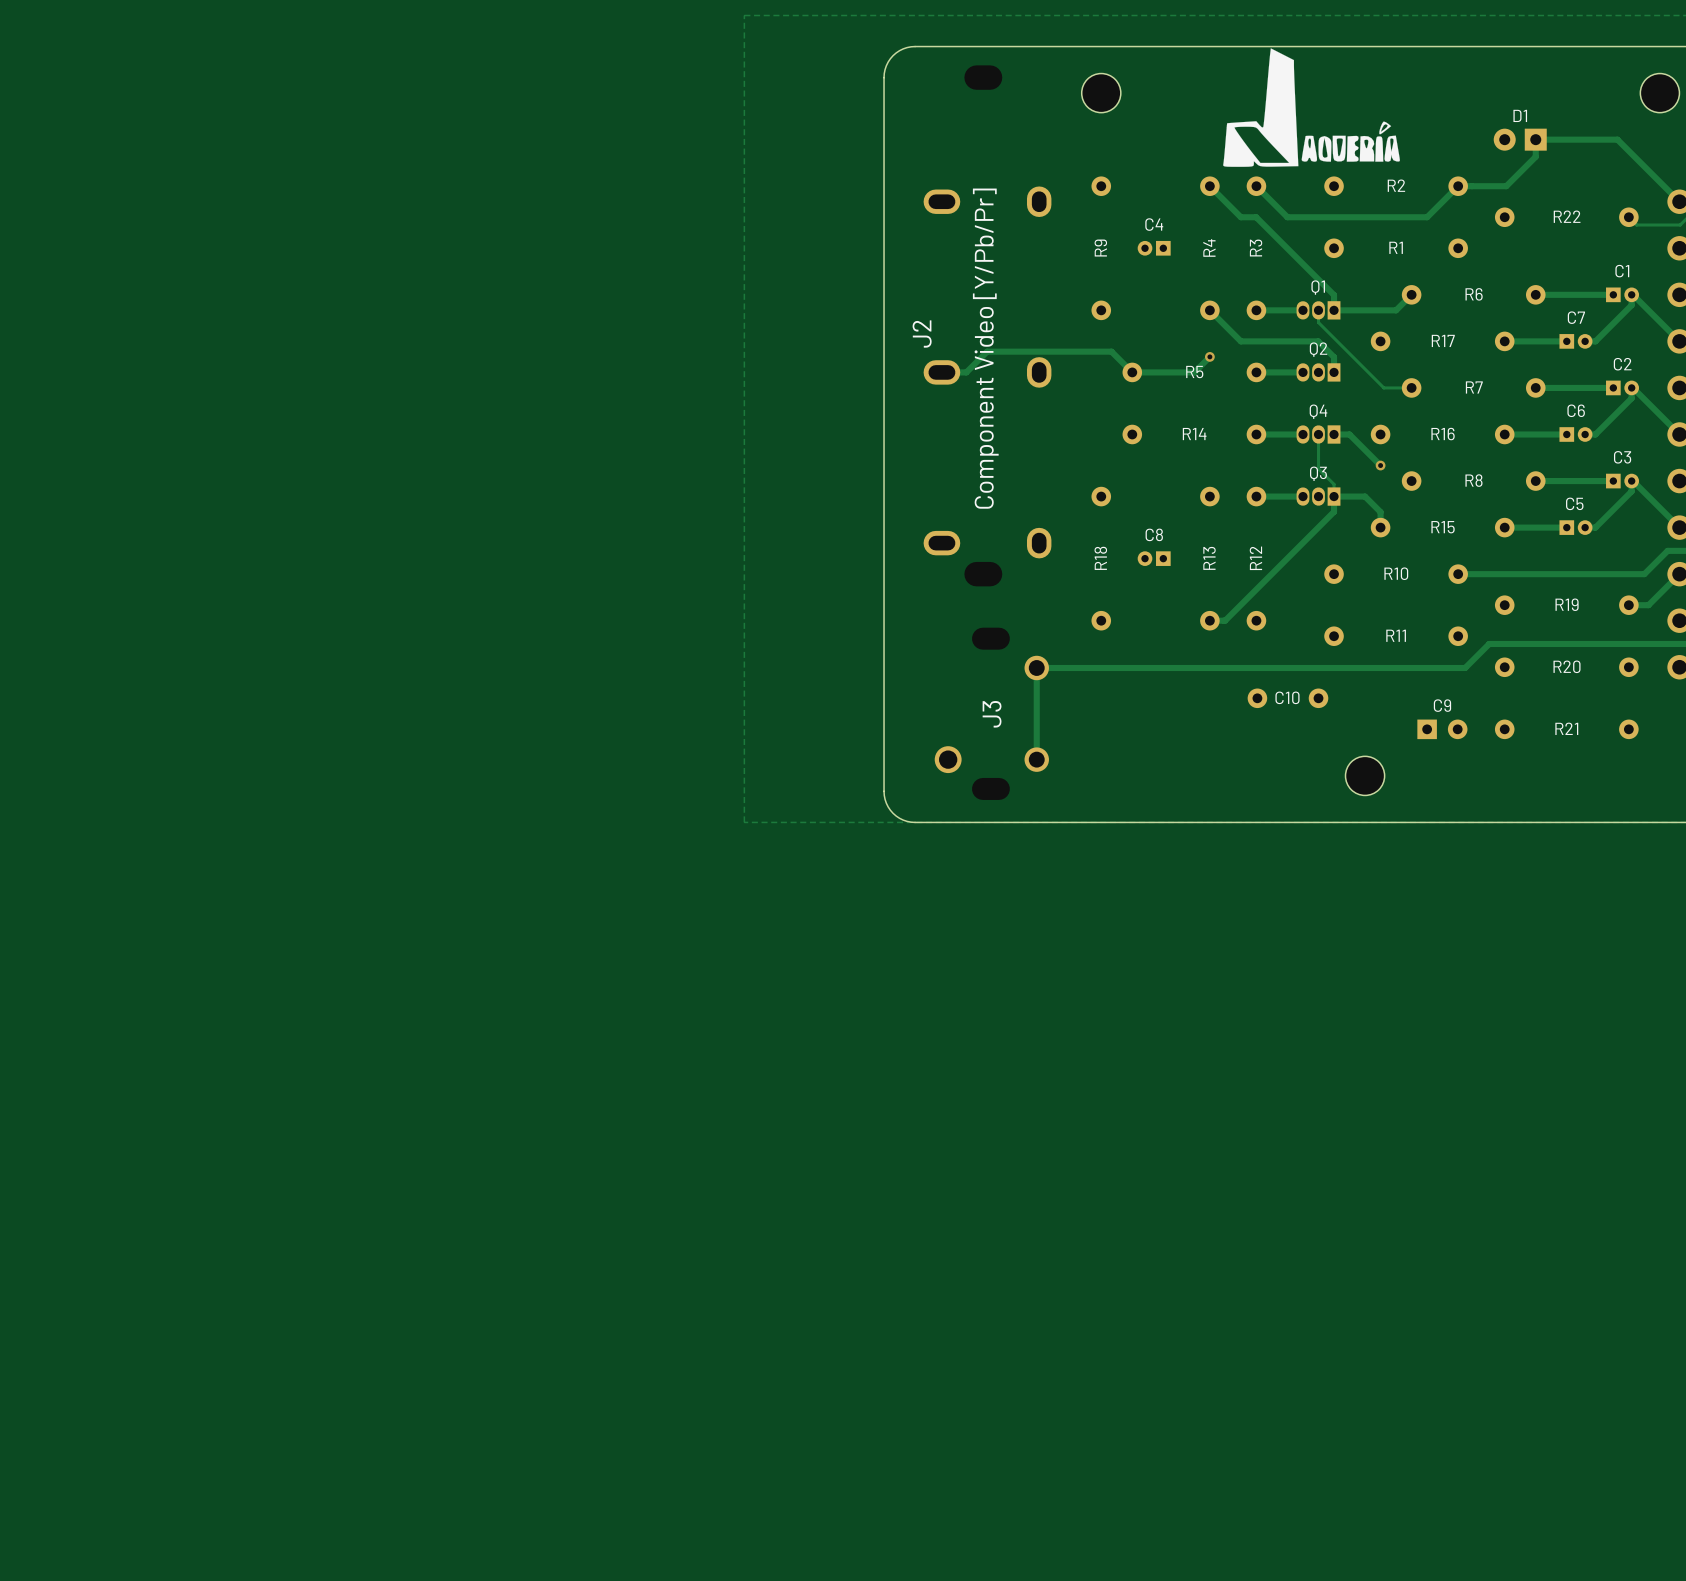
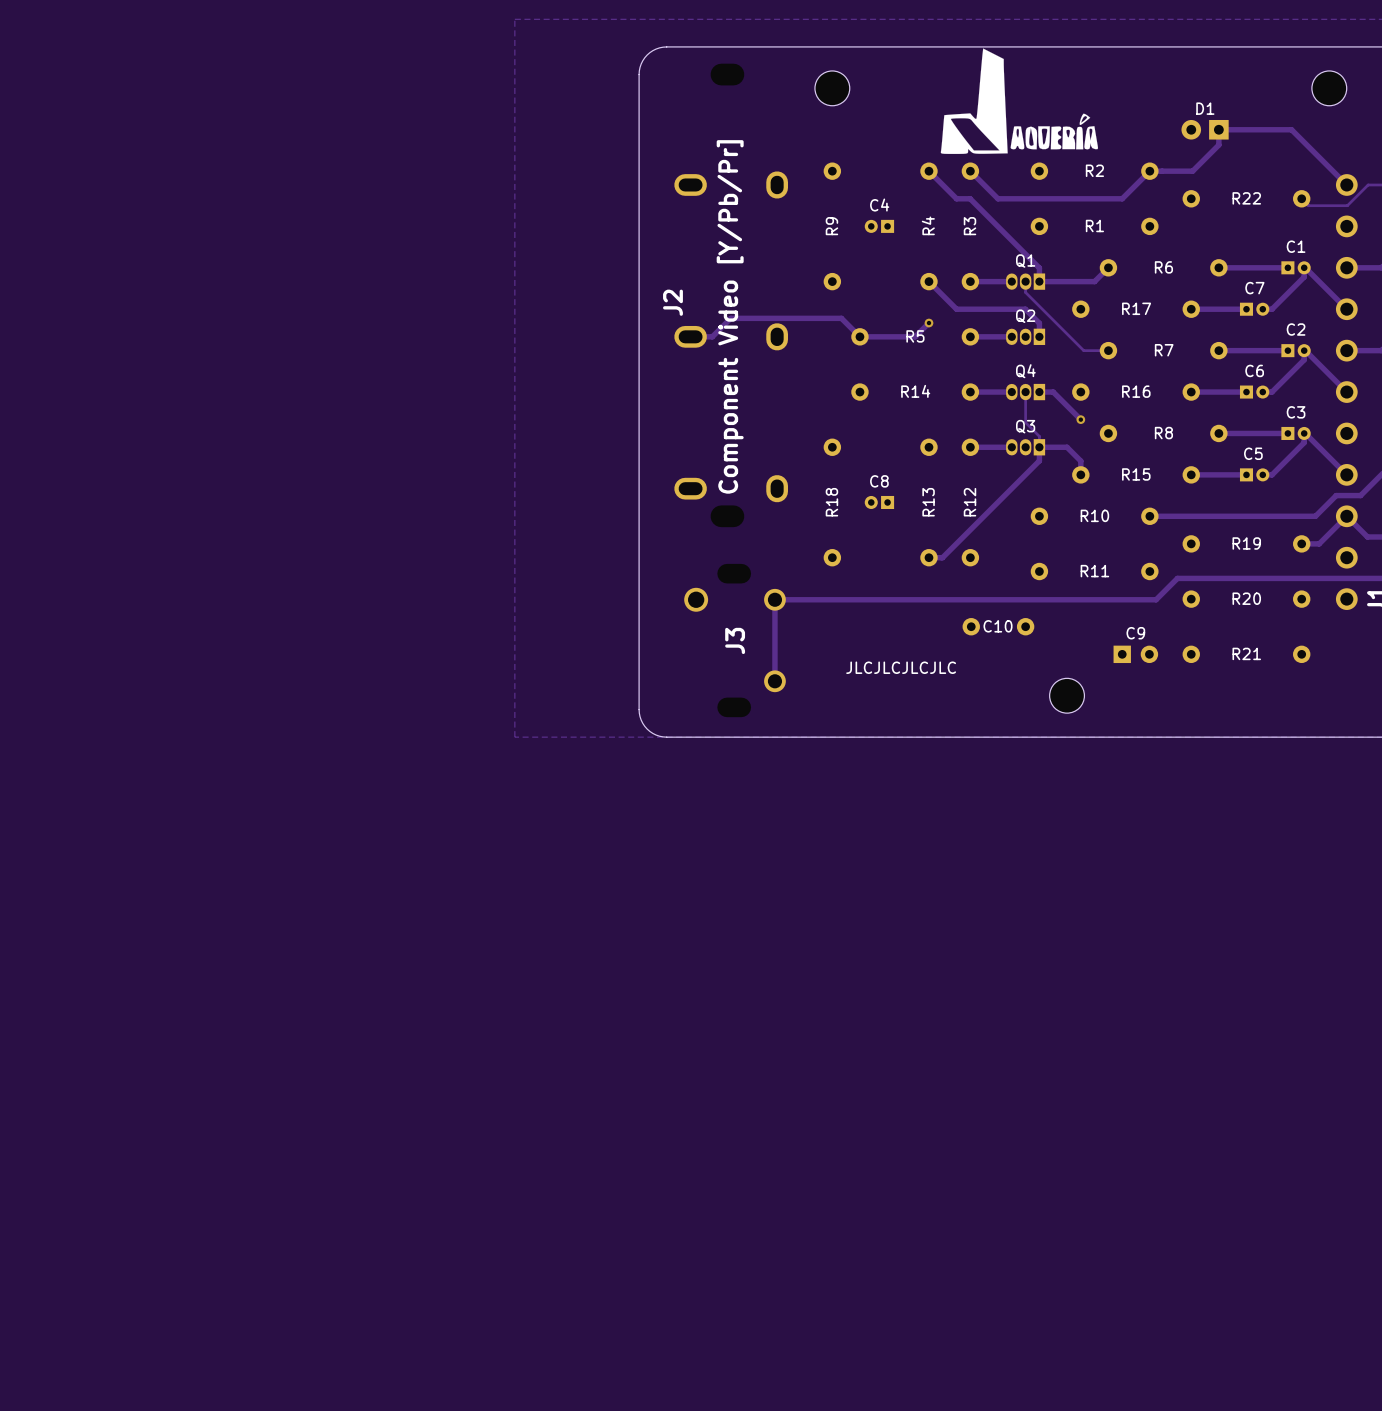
J3 footprint: [934, 627, 1049, 800] -> [684, 563, 786, 718]
text: none -> JLCJLCJLCJLC (901, 667)

